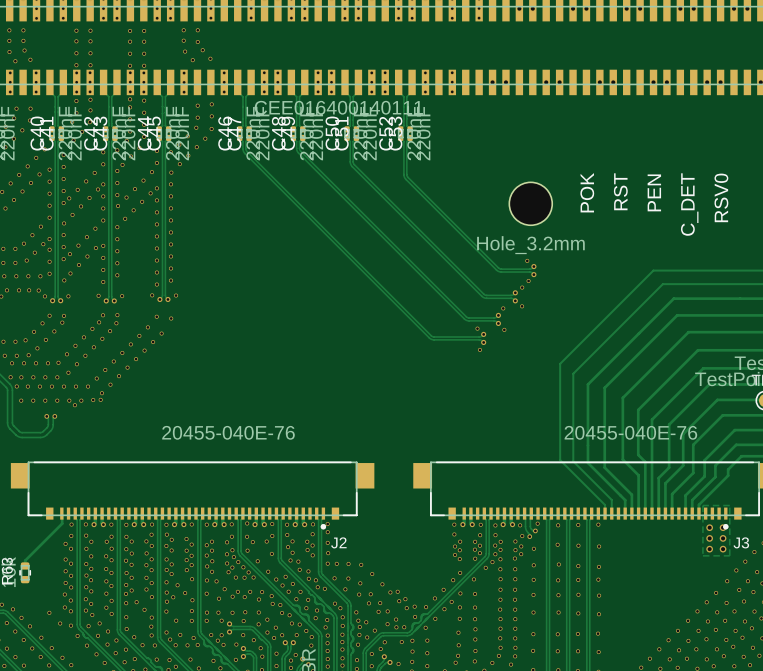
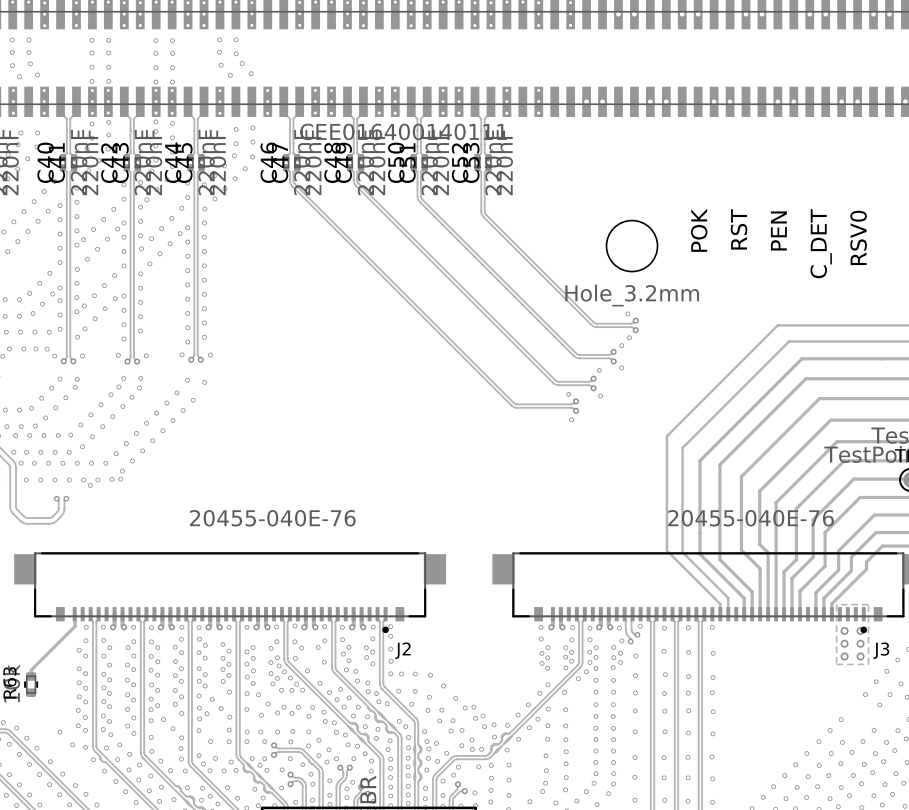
via: (716, 592) -> none
via: (753, 592) -> none
via: (744, 601) -> none
via: (726, 602) -> none
via: (717, 612) -> none

